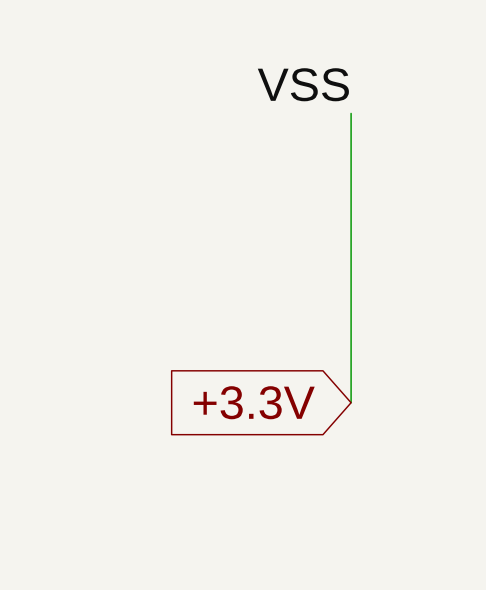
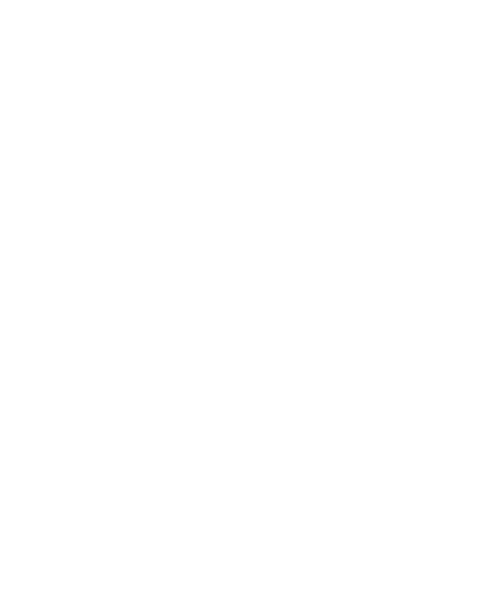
label: VSS (303, 84) -> none
wire: (351, 113) (351, 402) -> none
global label: +3.3V (254, 402) -> none

